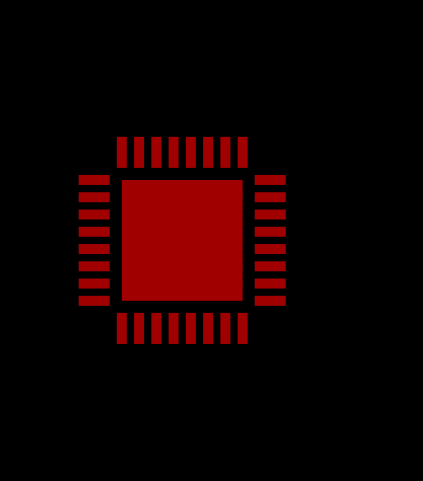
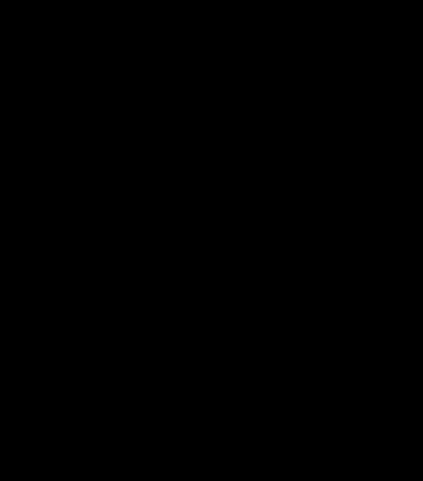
part: (182, 240) -> none

